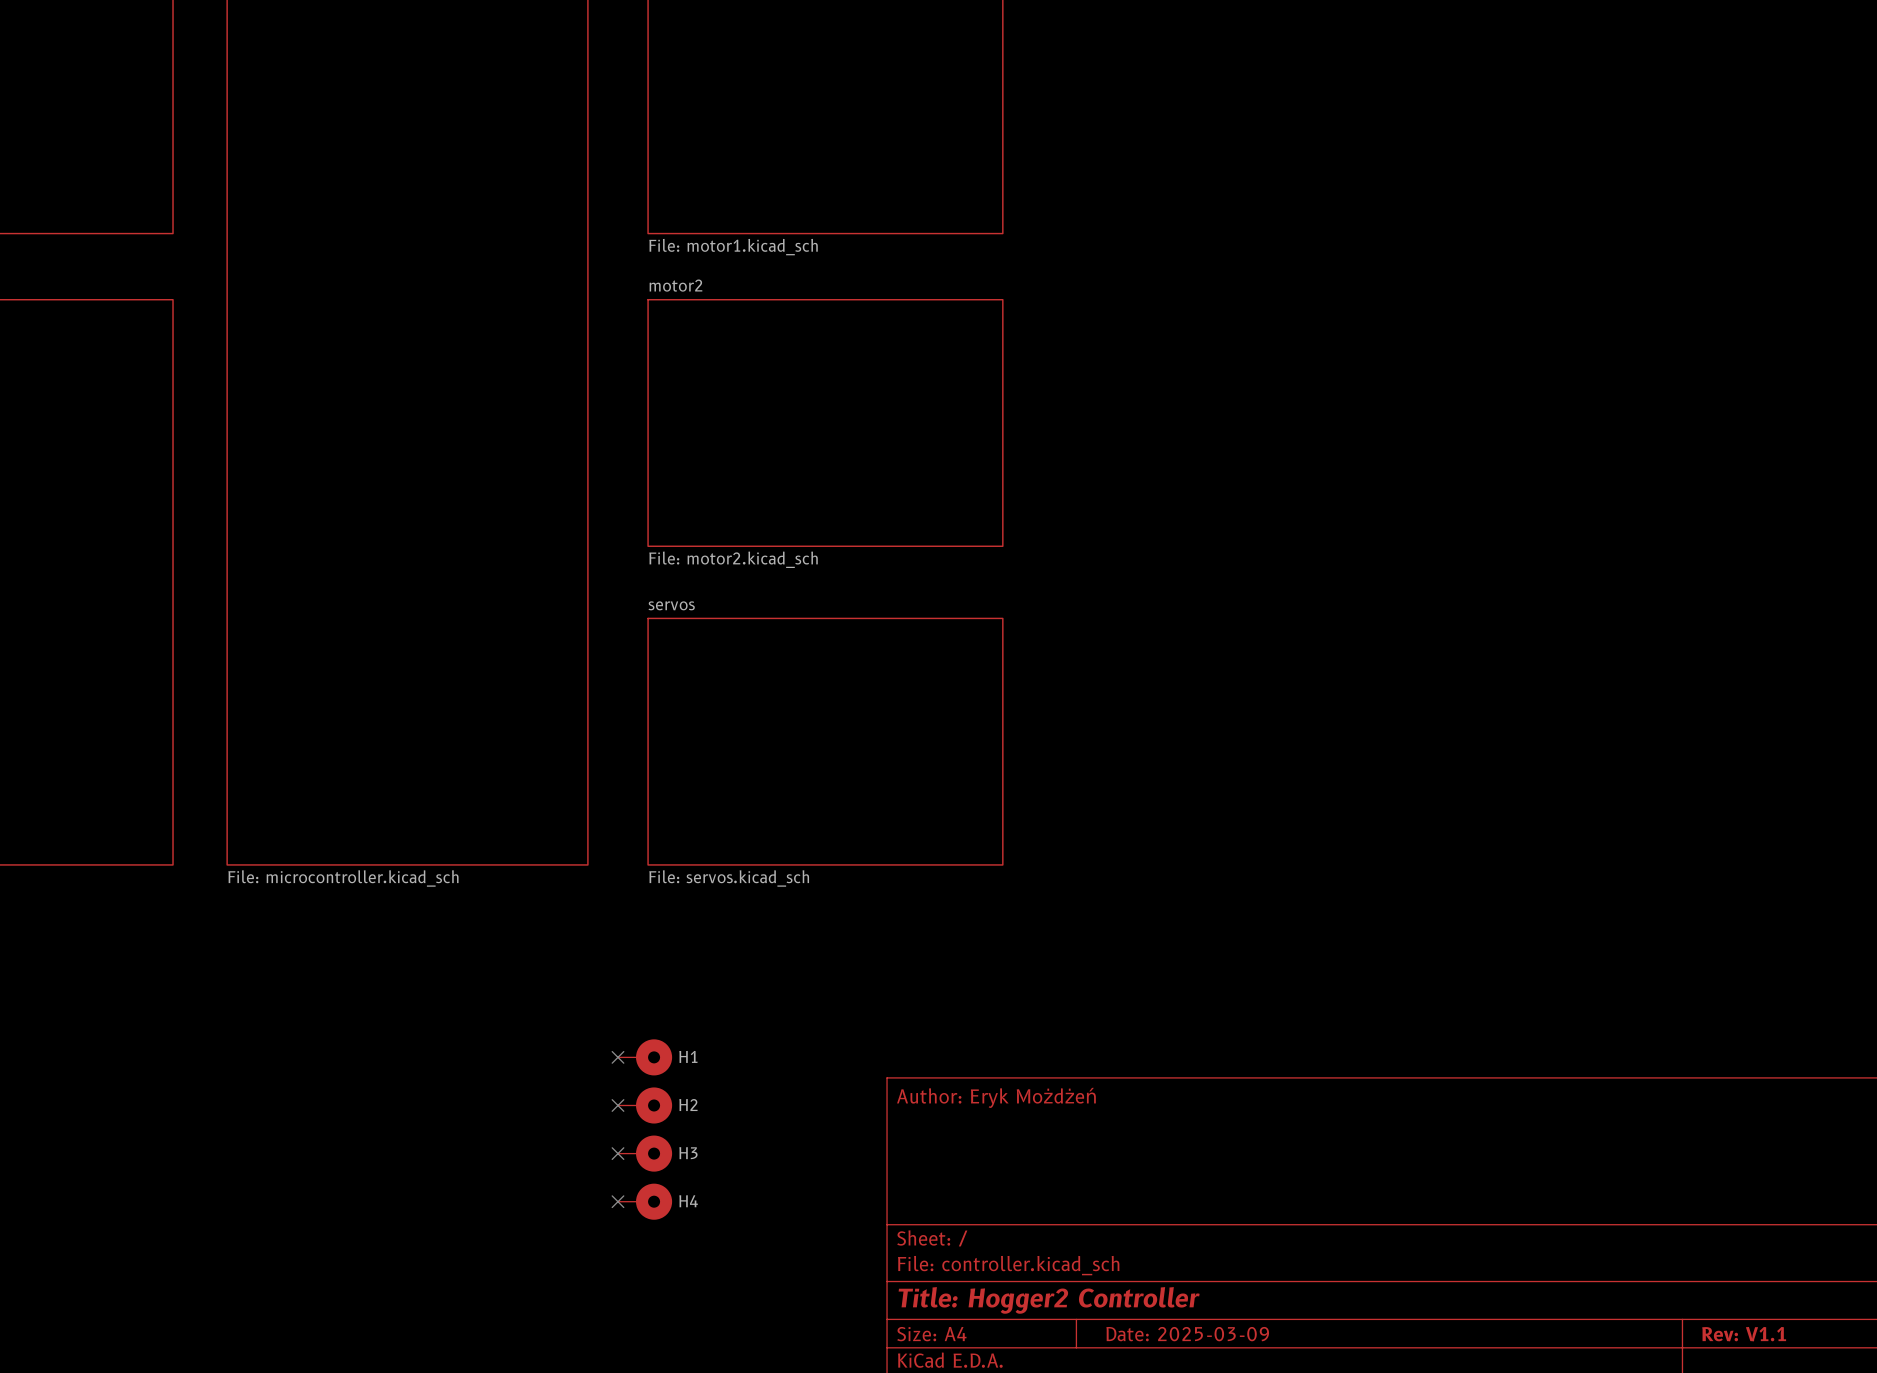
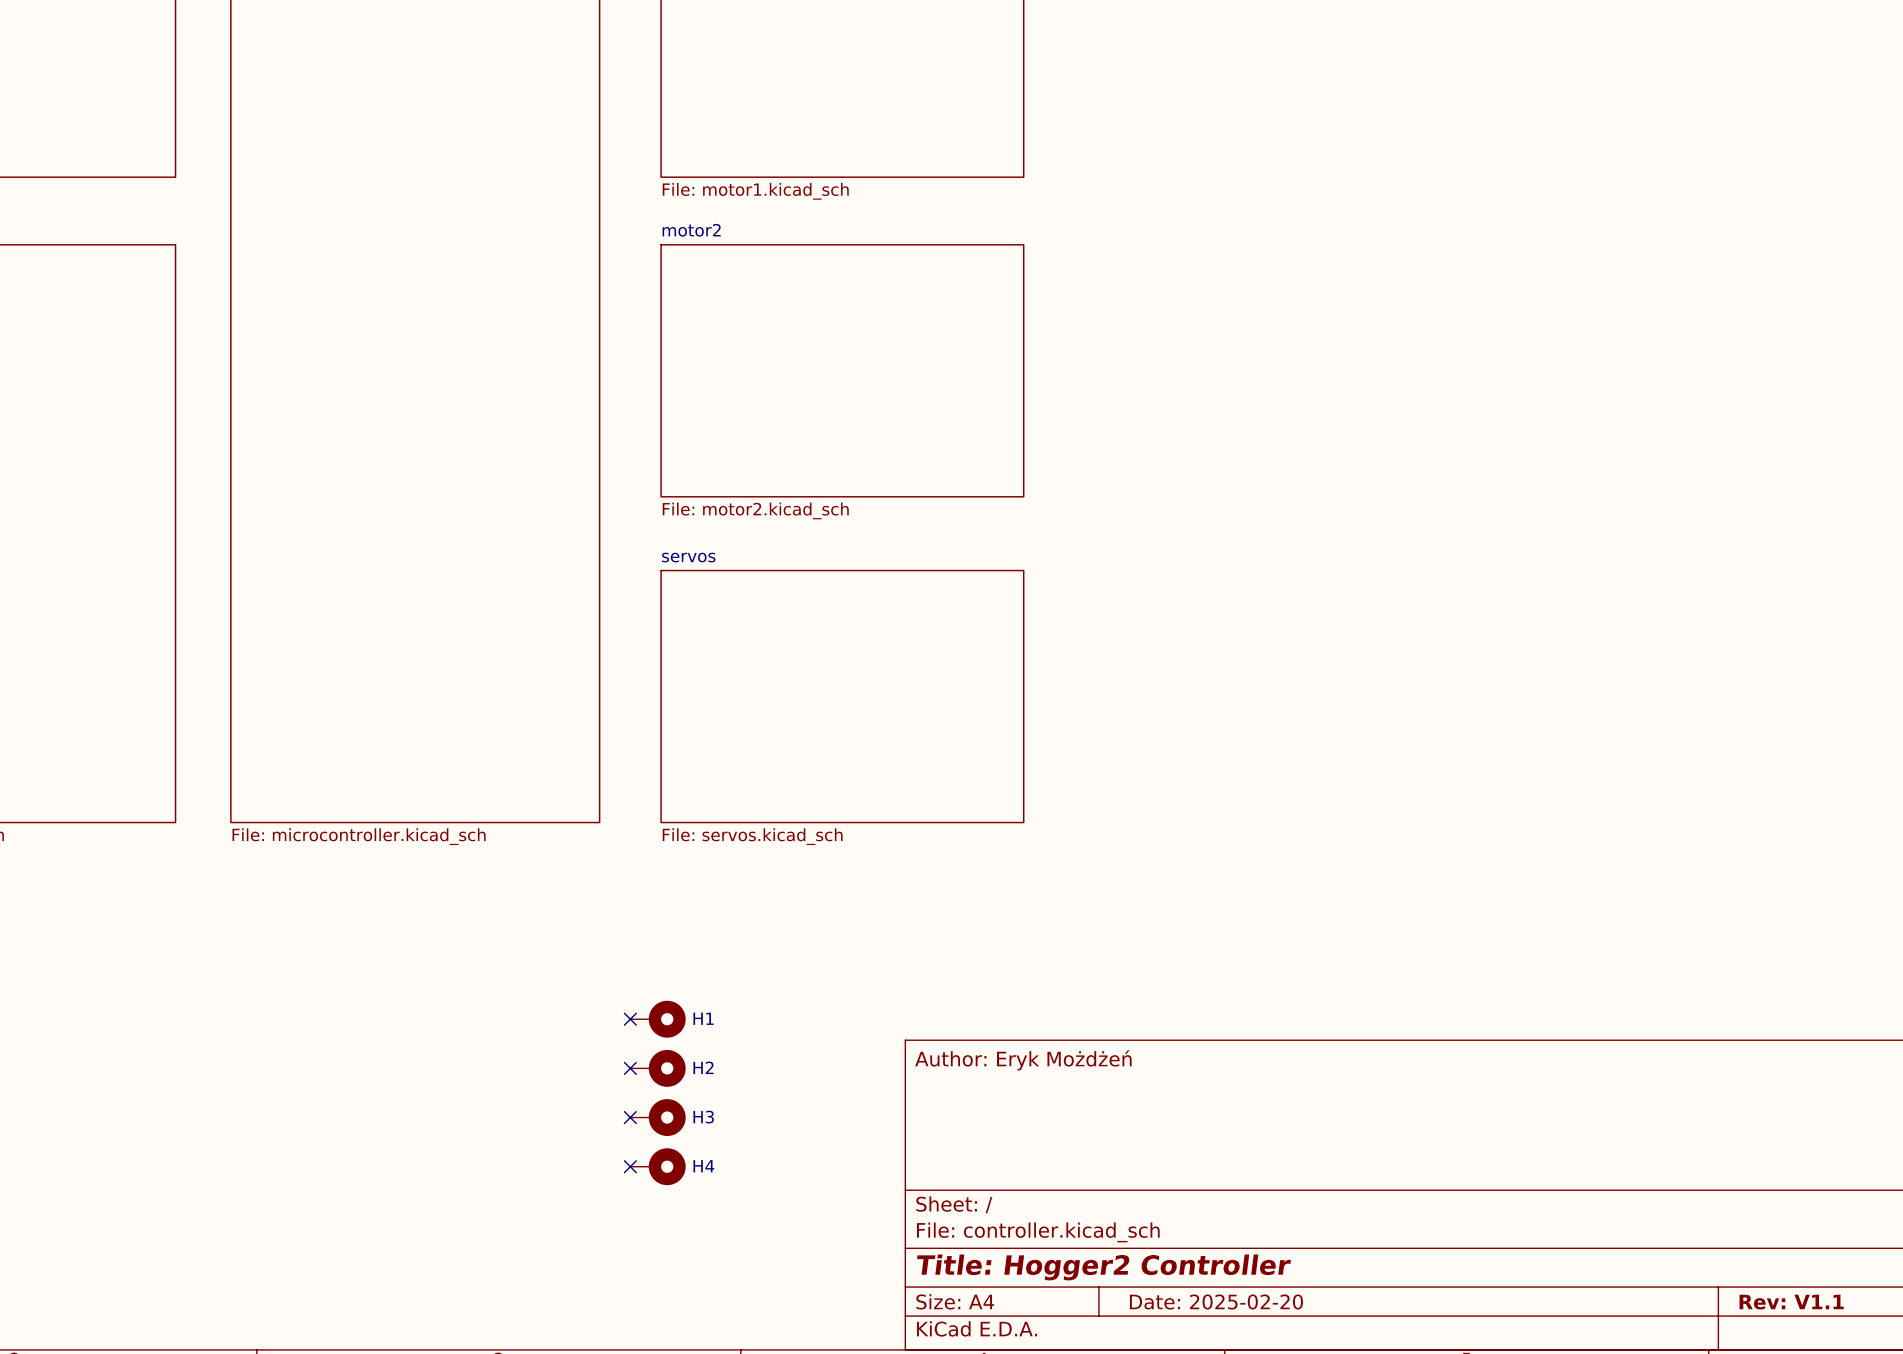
title block: Date: 2025-03-09 (1187, 1334) -> Date: 2025-02-20 (1216, 1301)

